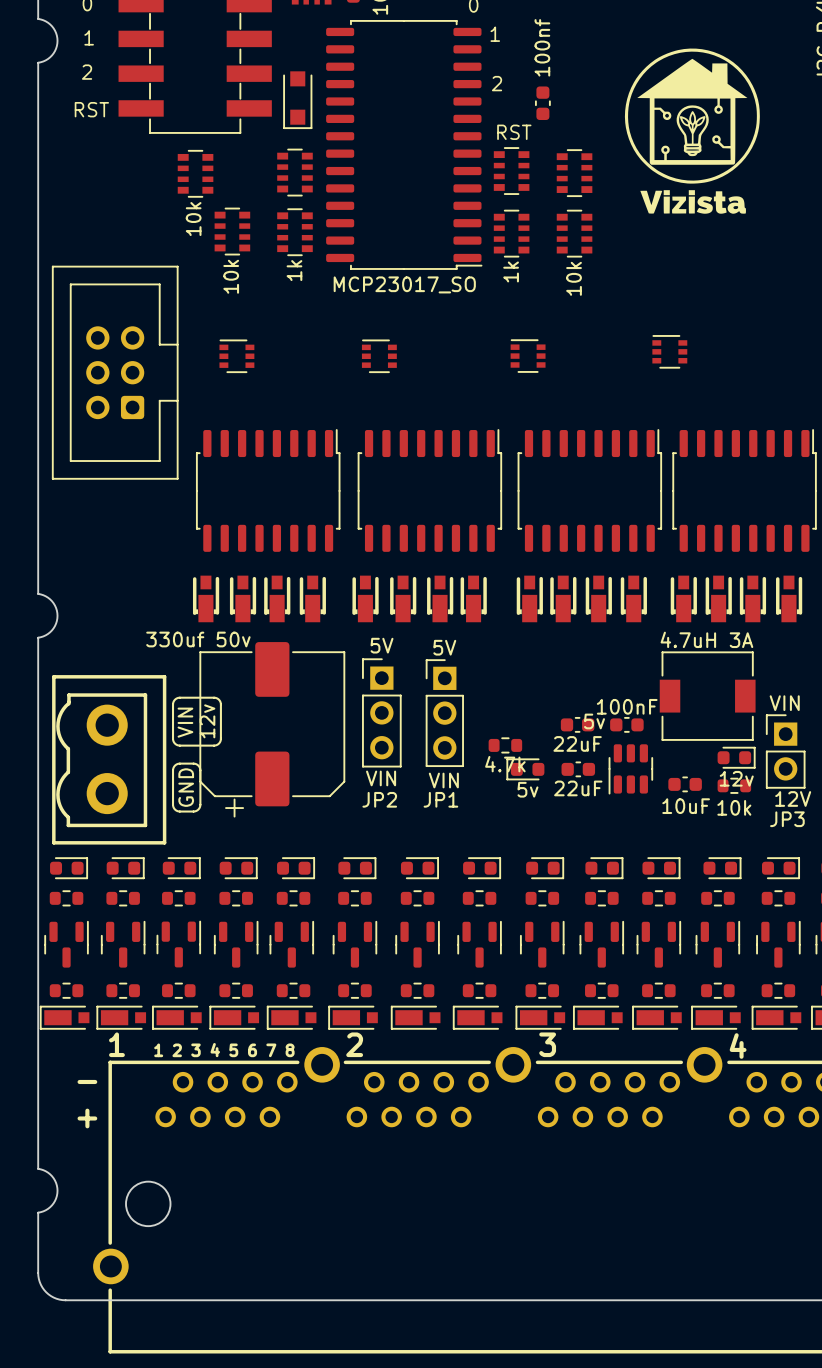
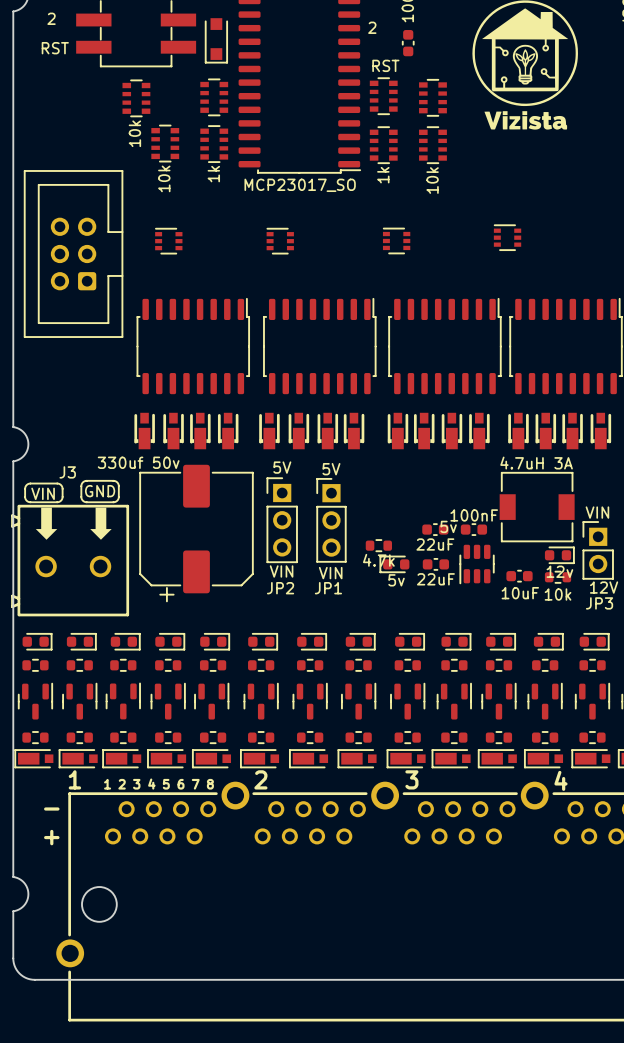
text: none -> J3 (67, 472)
line: none -> (86, 480) (116, 481) (118, 485) (118, 499) (113, 502) (84, 501) (81, 497) (81, 485) (86, 480)
line: none -> (30, 483) (59, 484) (62, 488) (61, 499) (57, 502) (27, 501) (25, 497) (25, 488) (30, 483)
part footprint: [52, 675, 167, 845] -> [11, 504, 130, 617]
line: (179, 697) (214, 697) (219, 700) (220, 738) (218, 744) (179, 745) (174, 742) (173, 703) (175, 699) (179, 697) -> none
text: 12v (207, 721) -> none
text rotation: 0° (185, 722) -> 90° clockwise (43, 493)
text position: VIN (185, 722) -> VIN (43, 493)
line: (179, 763) (195, 763) (200, 768) (200, 805) (195, 811) (178, 811) (173, 806) (173, 769) (175, 765) (179, 763) -> none
text rotation: 0° (186, 787) -> 90° clockwise (100, 491)
text position: GND (186, 787) -> GND (100, 491)

